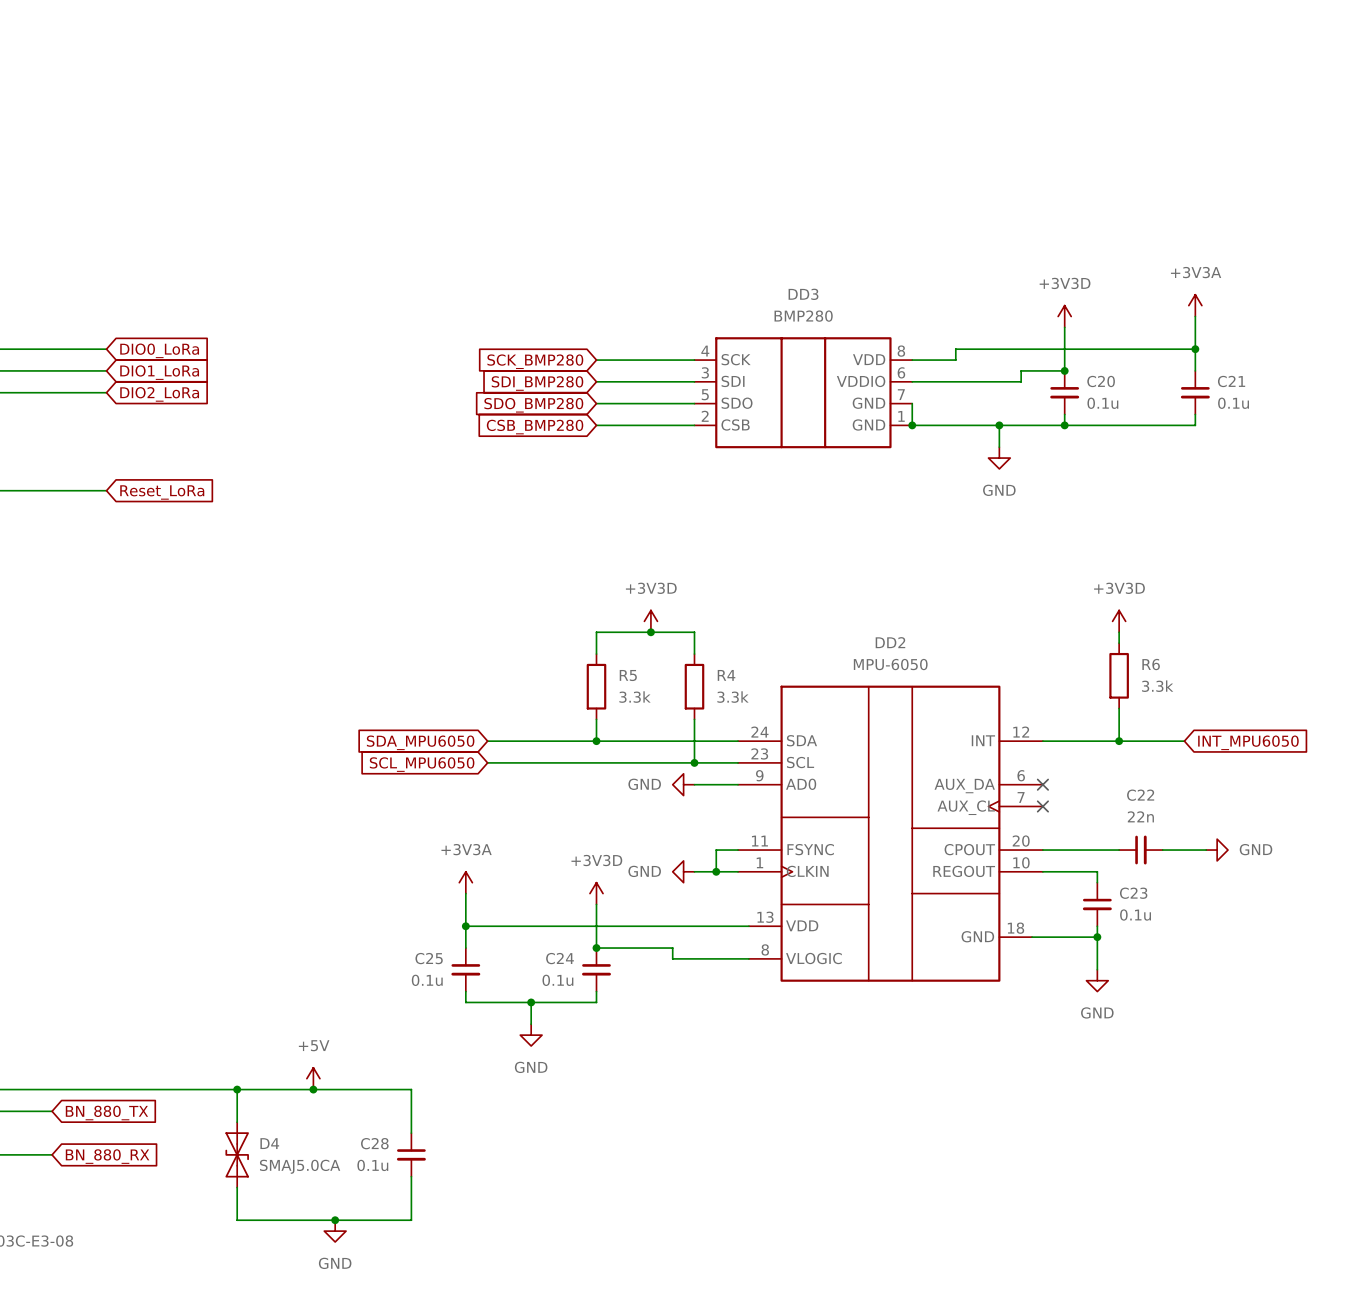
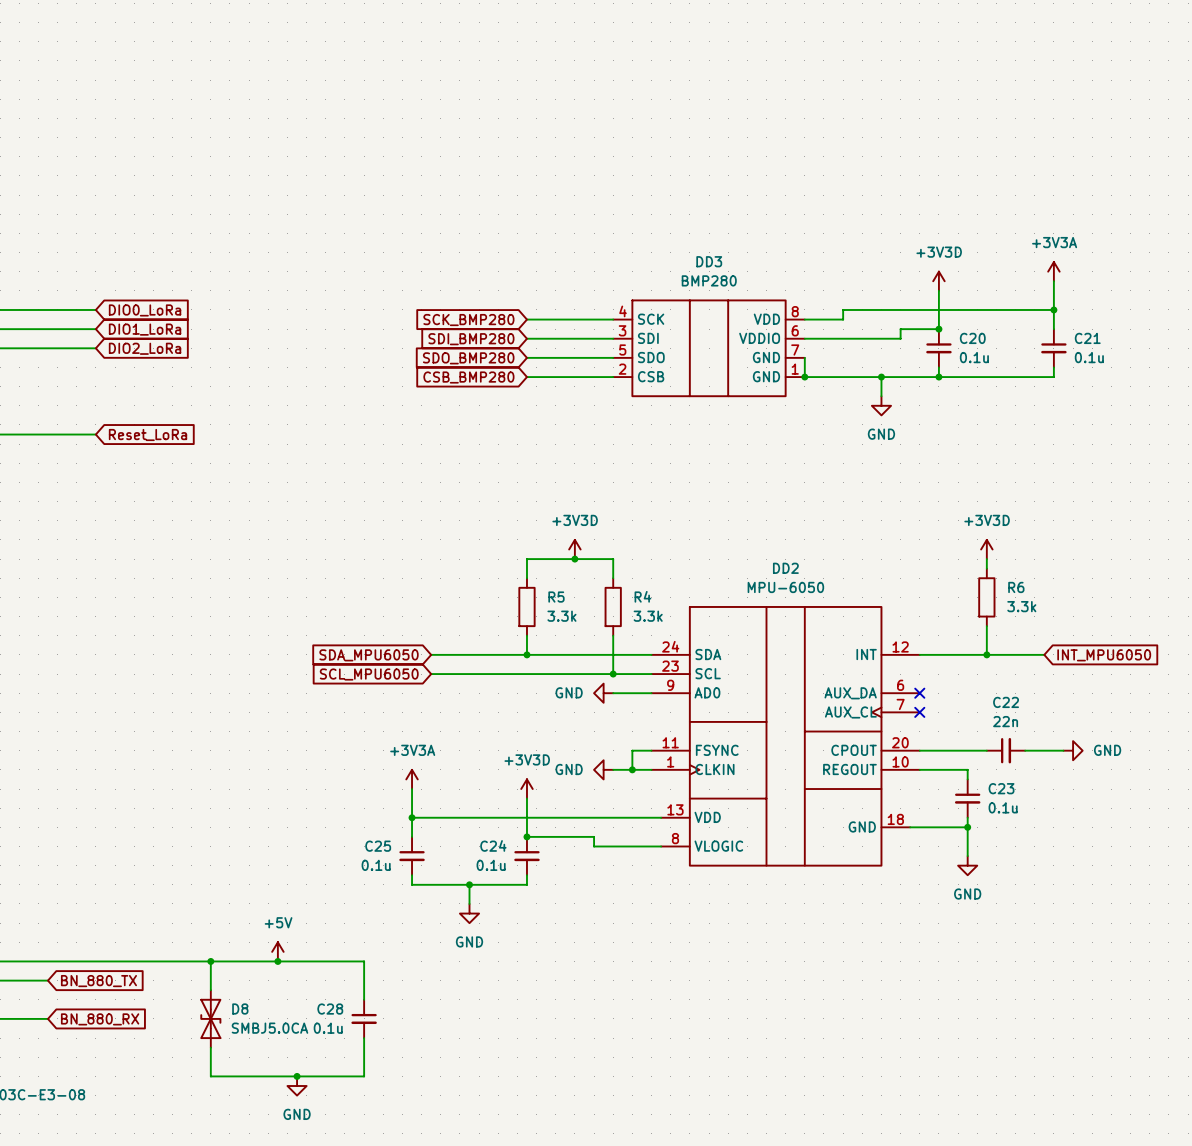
D4: SMAJ5.0CA (237, 1154) -> none
D8: none -> SMBJ5.0CA (210, 1018)

